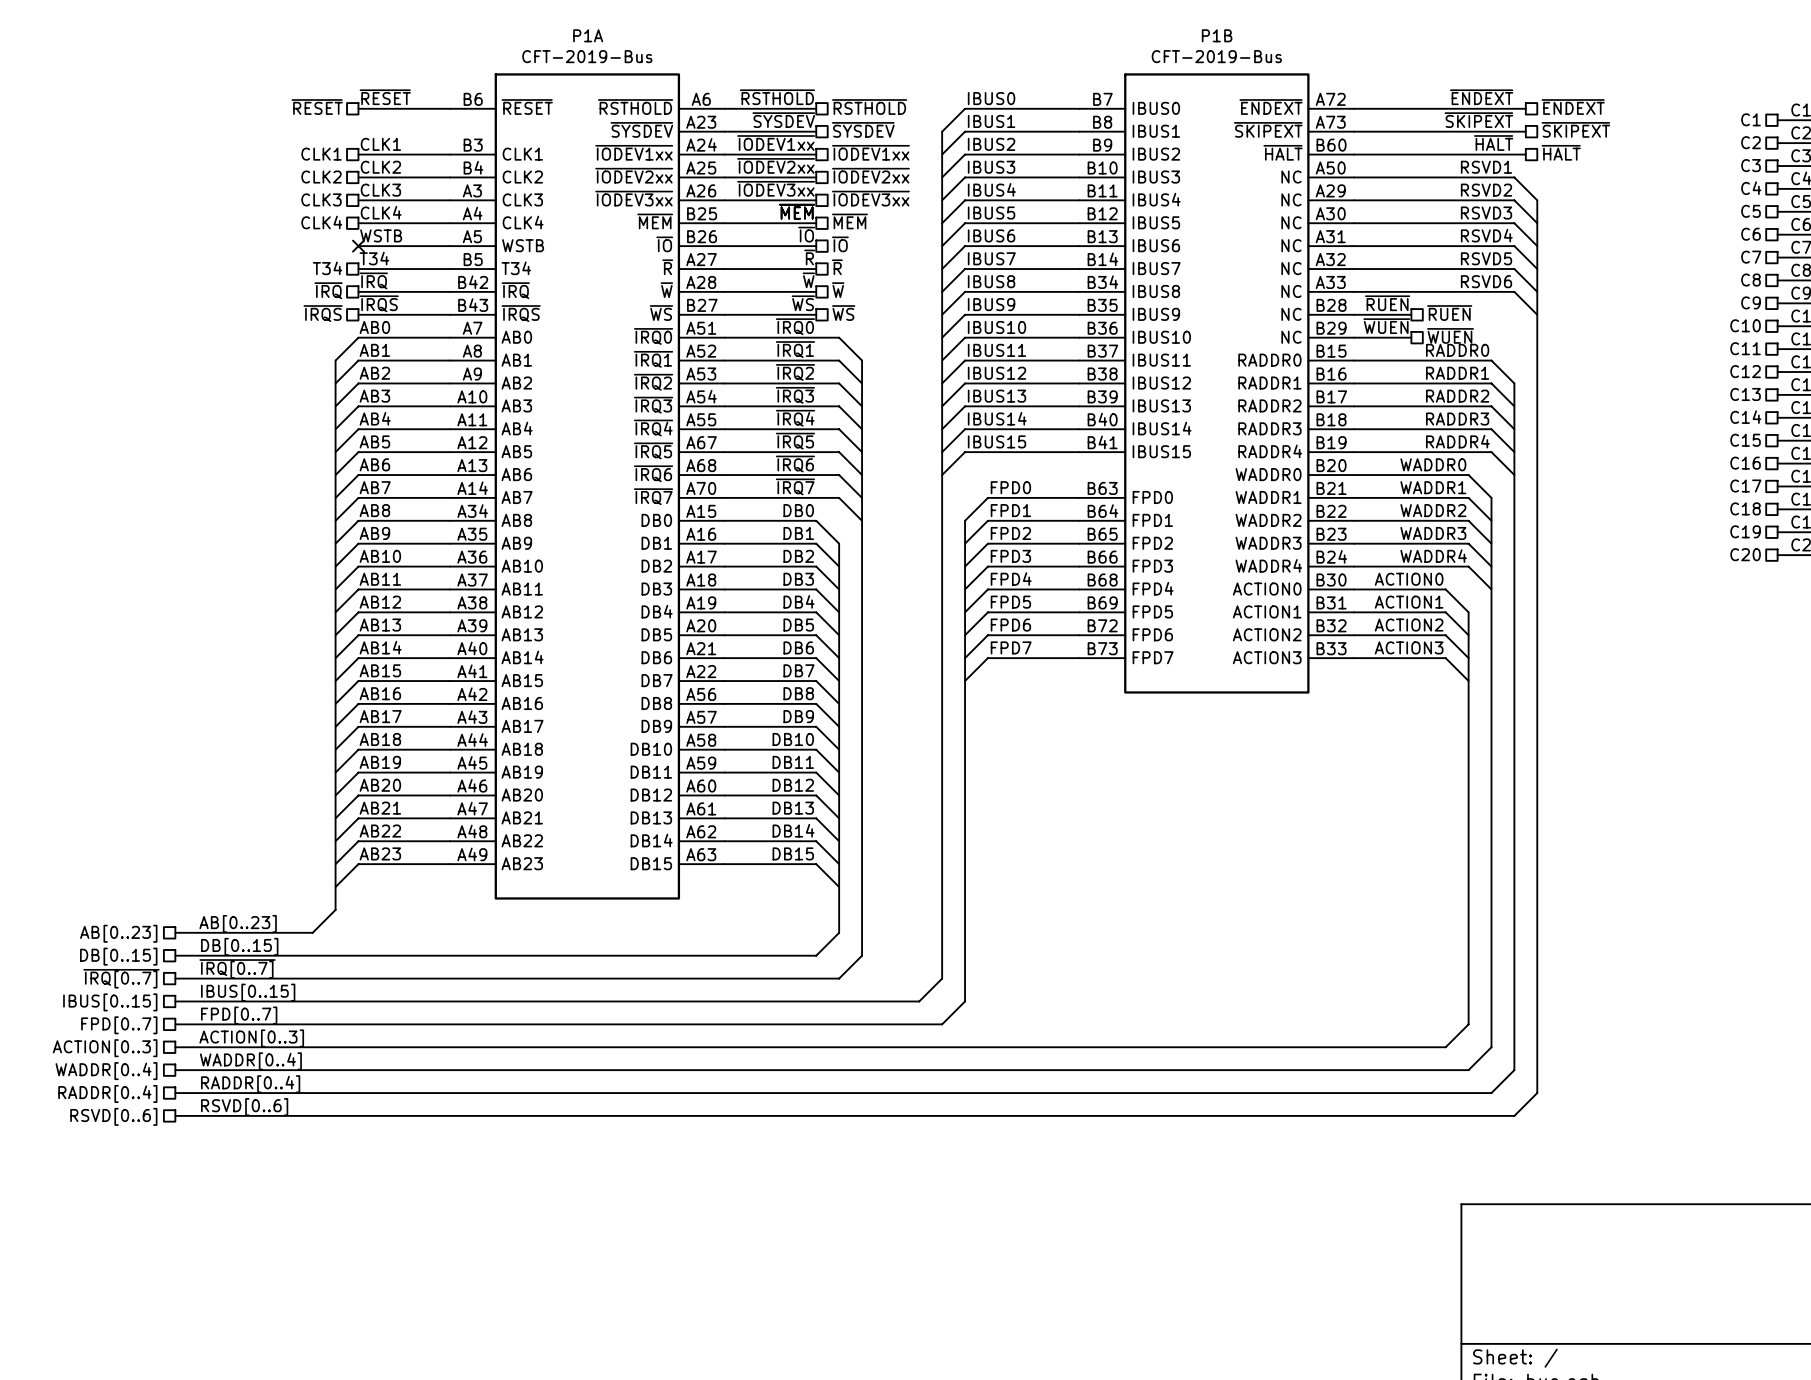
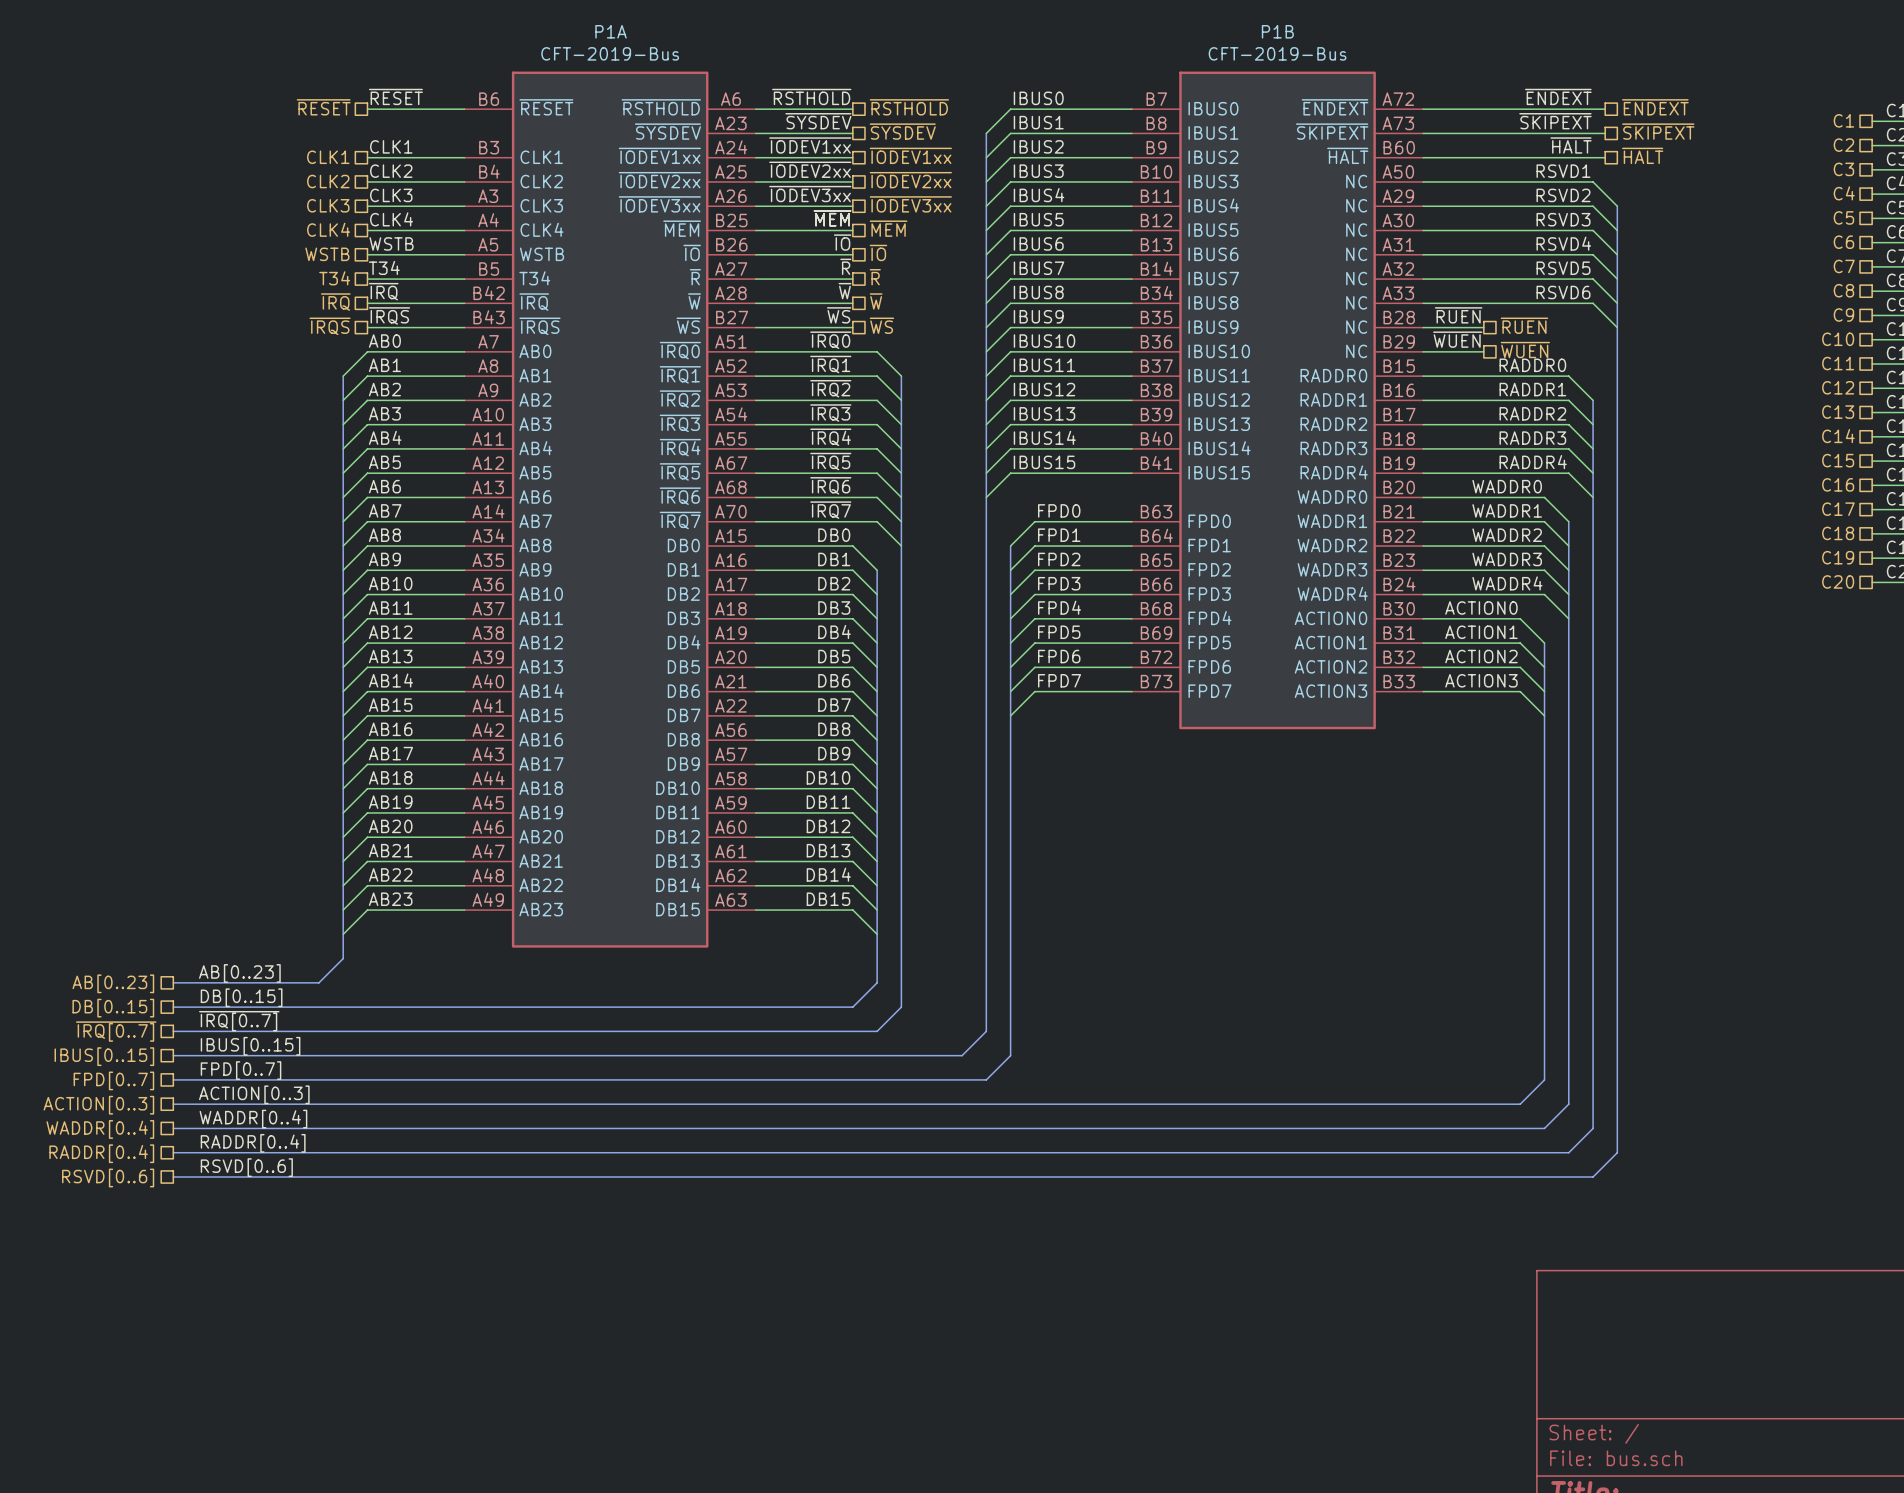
hierarchical label: none -> WSTB (327, 254)
no-connect mark: (358, 246) -> none

